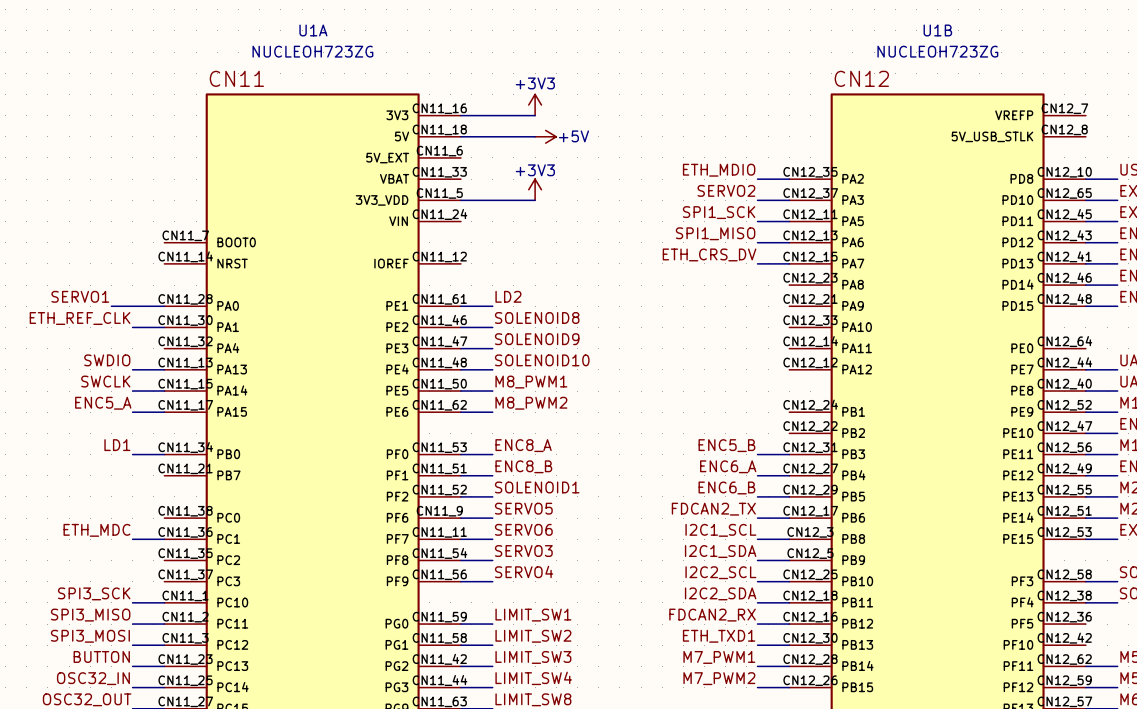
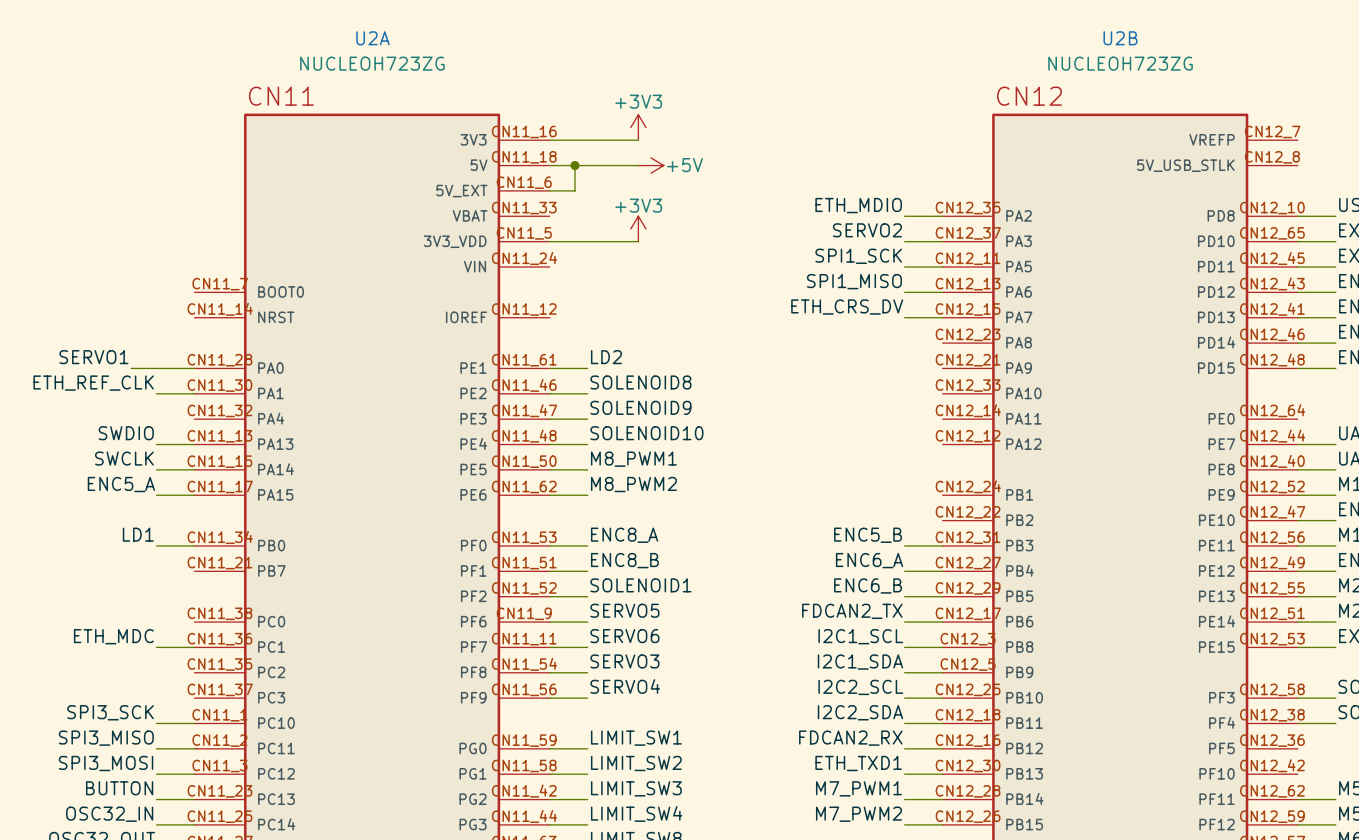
U1A name: U1A (313, 30) -> U2A (373, 38)
U1B name: U1B (937, 30) -> U2B (1120, 38)
wire: none -> (574, 165) (574, 190) (549, 190)
junction: none -> (574, 165)

